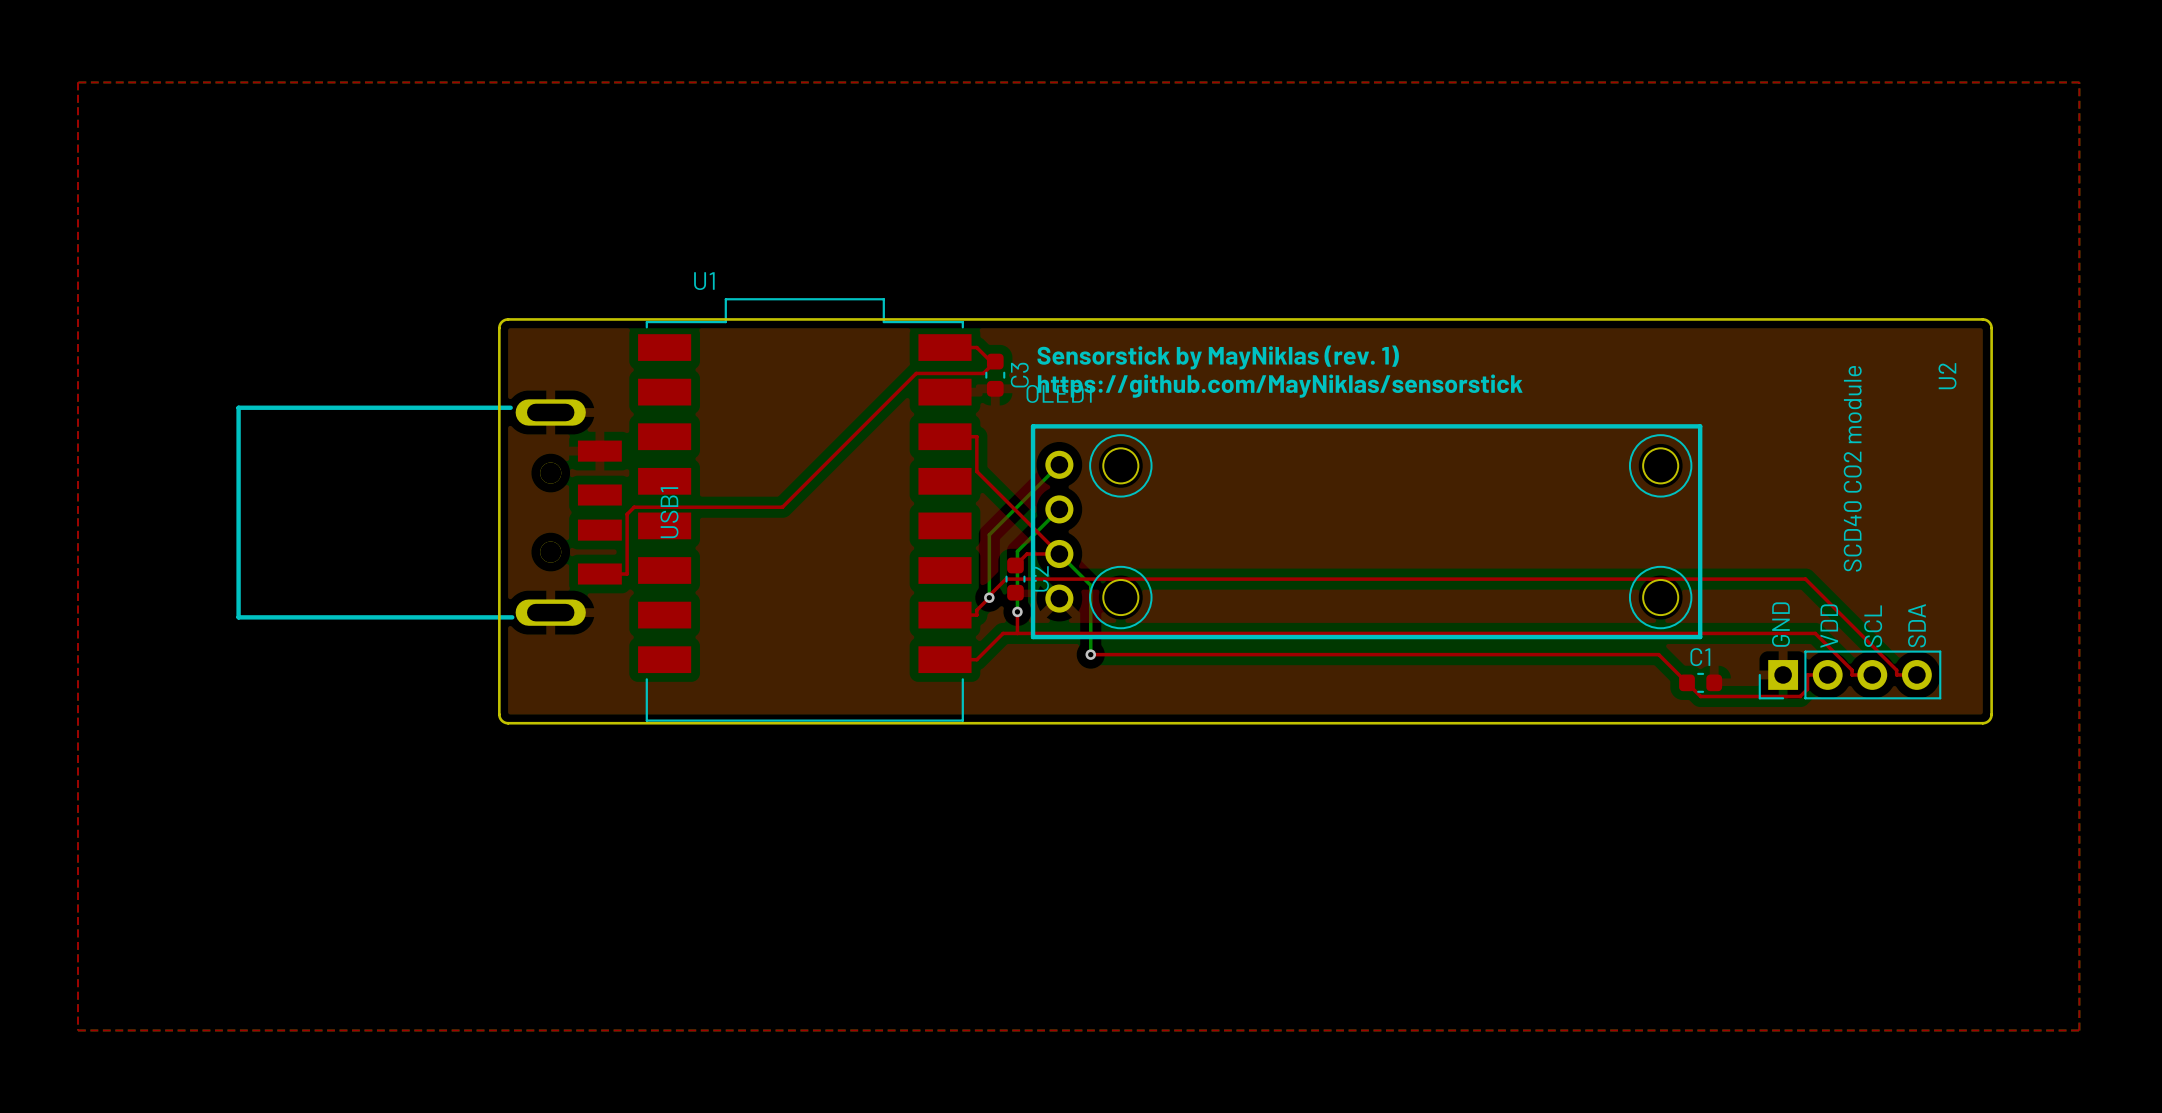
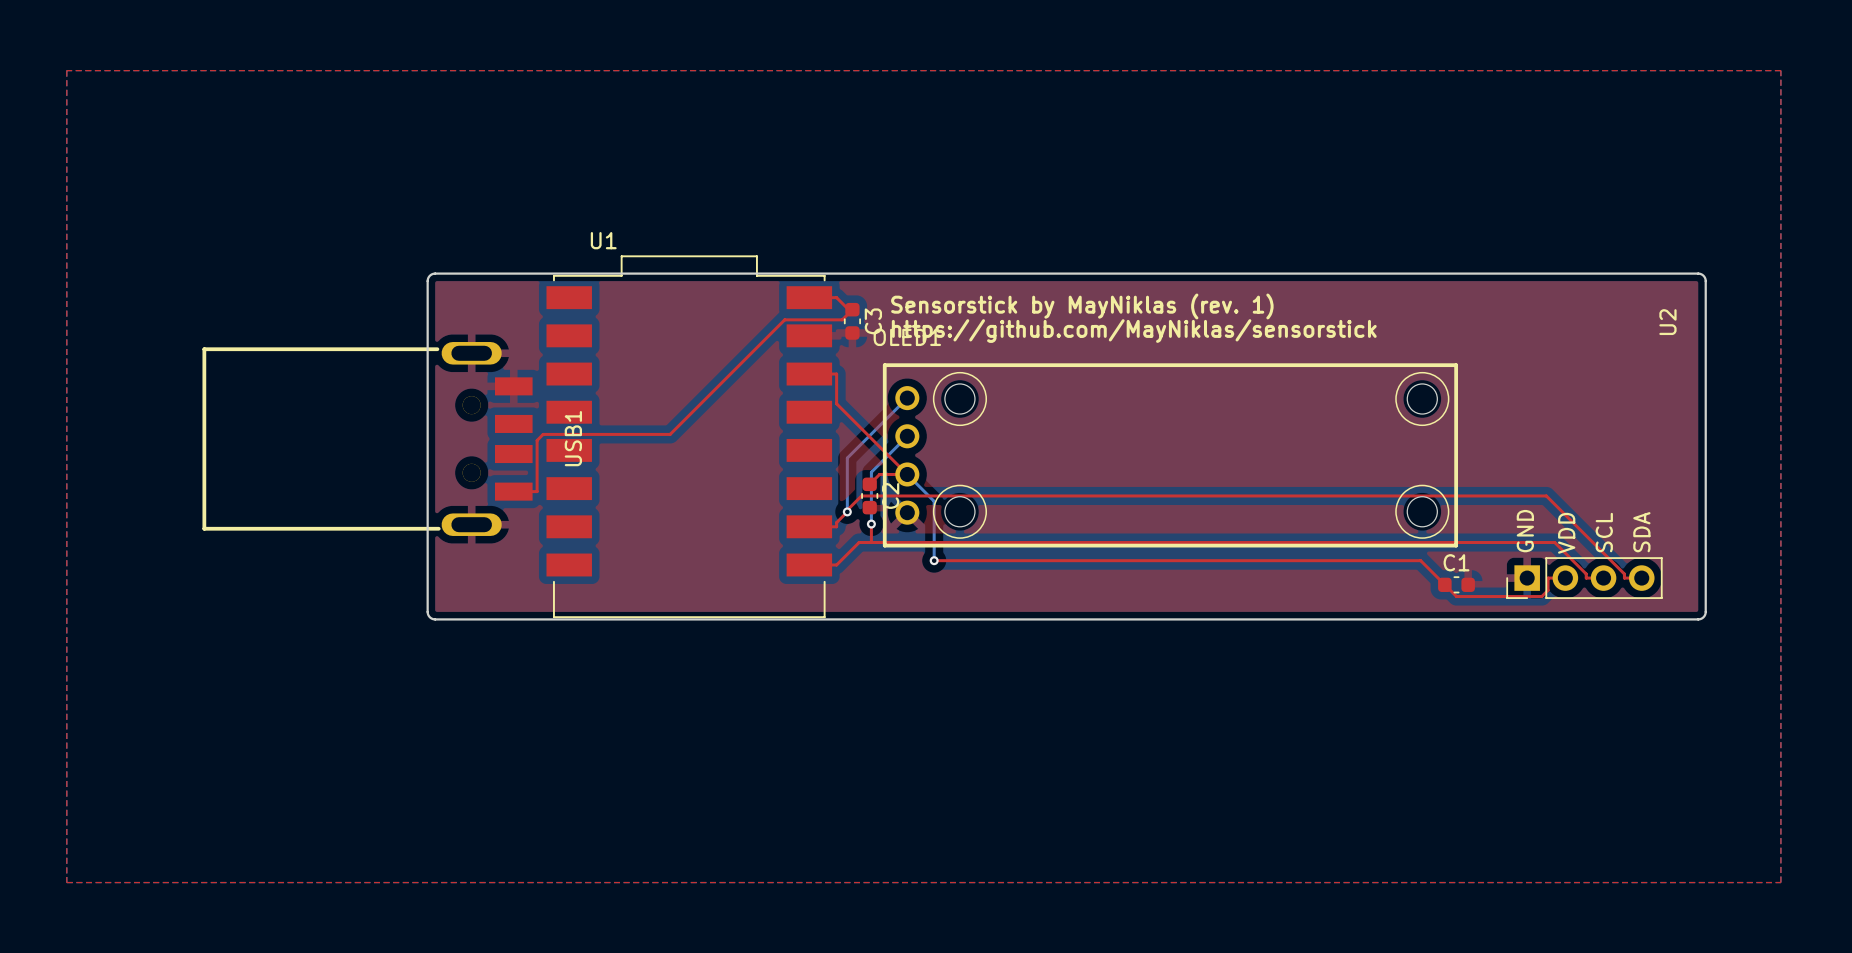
U2 value: SCD40 CO2 module (1852, 468) -> none

